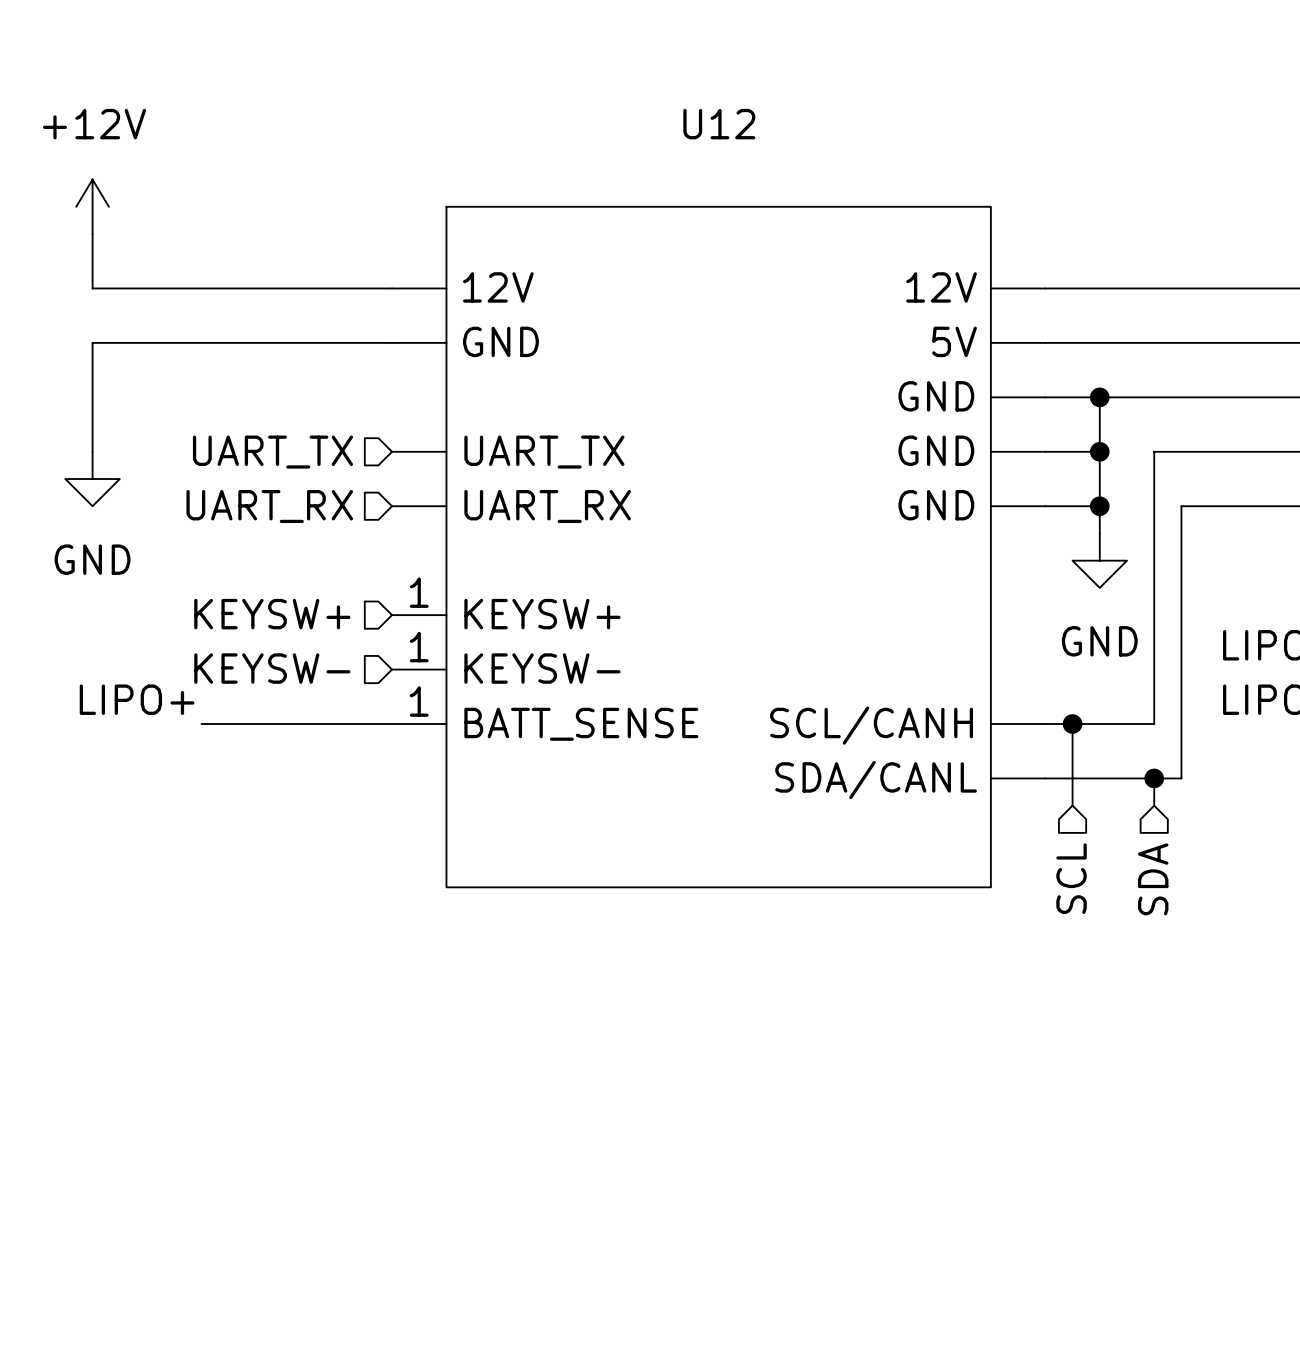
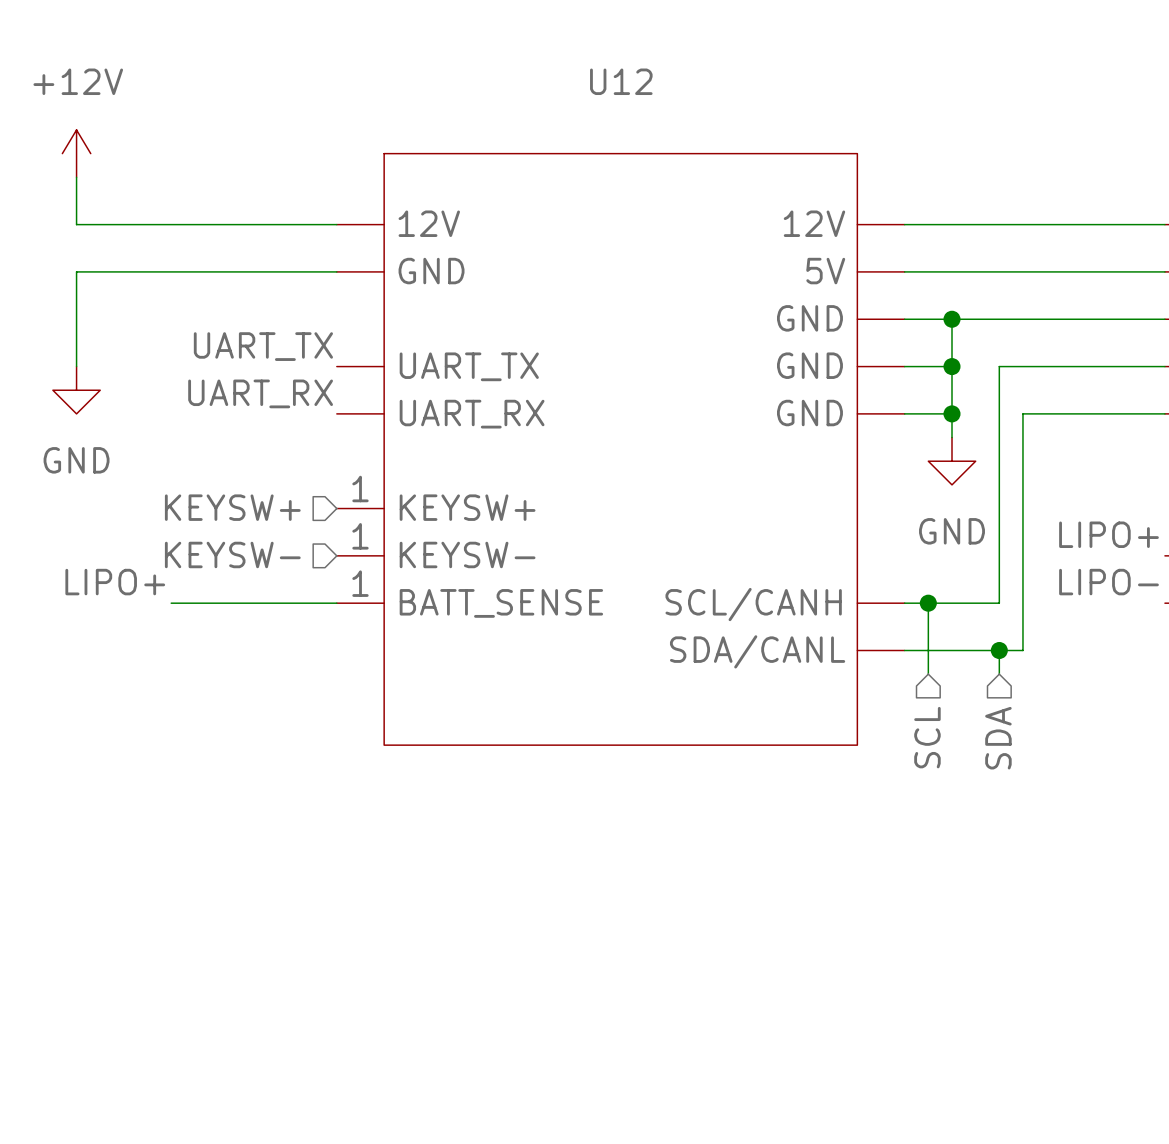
label: none -> UART_TX (263, 346)
hierarchical label: UART_TX (272, 452) -> none
label: none -> UART_RX (260, 393)
hierarchical label: UART_RX (269, 506) -> none

